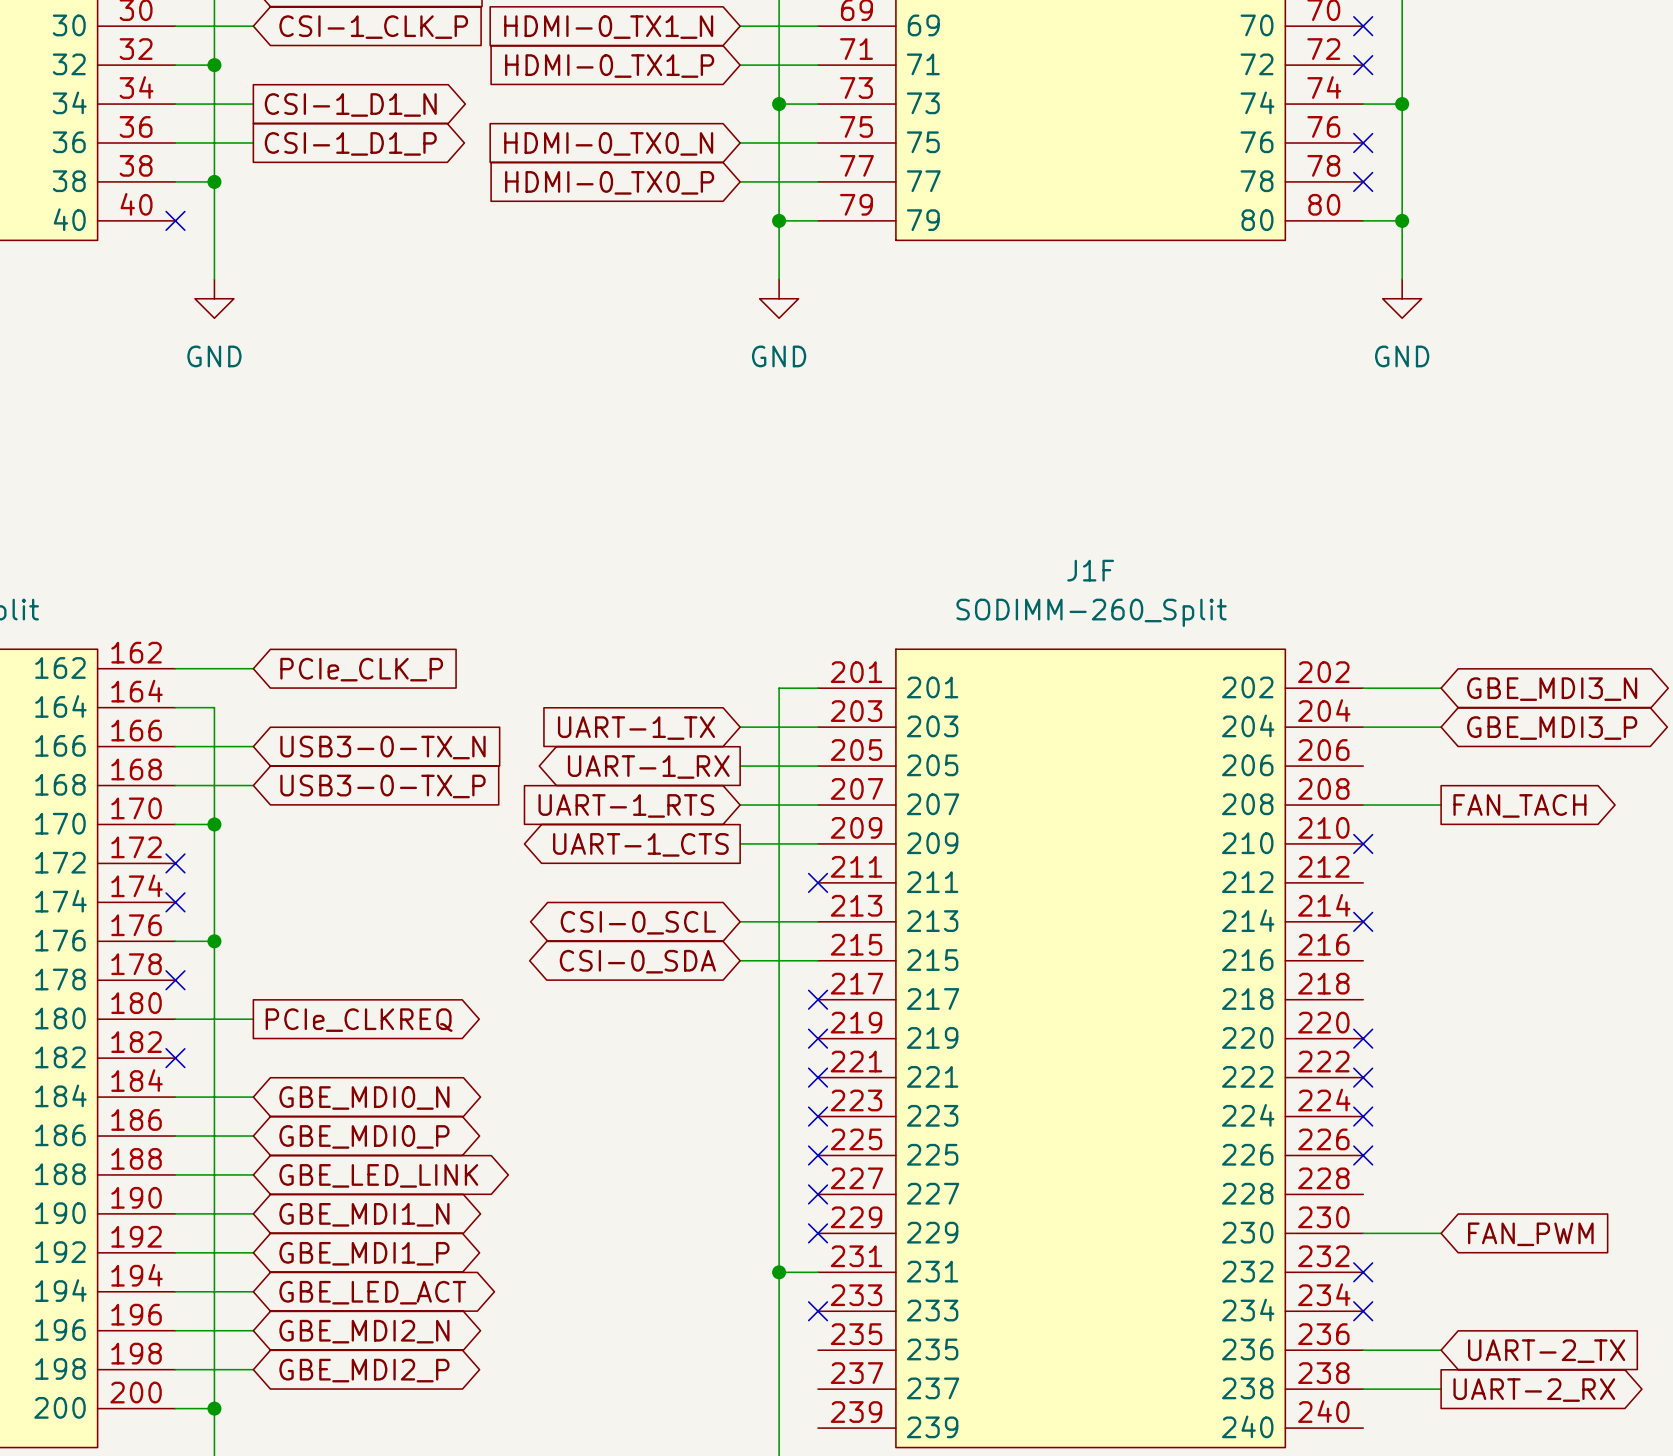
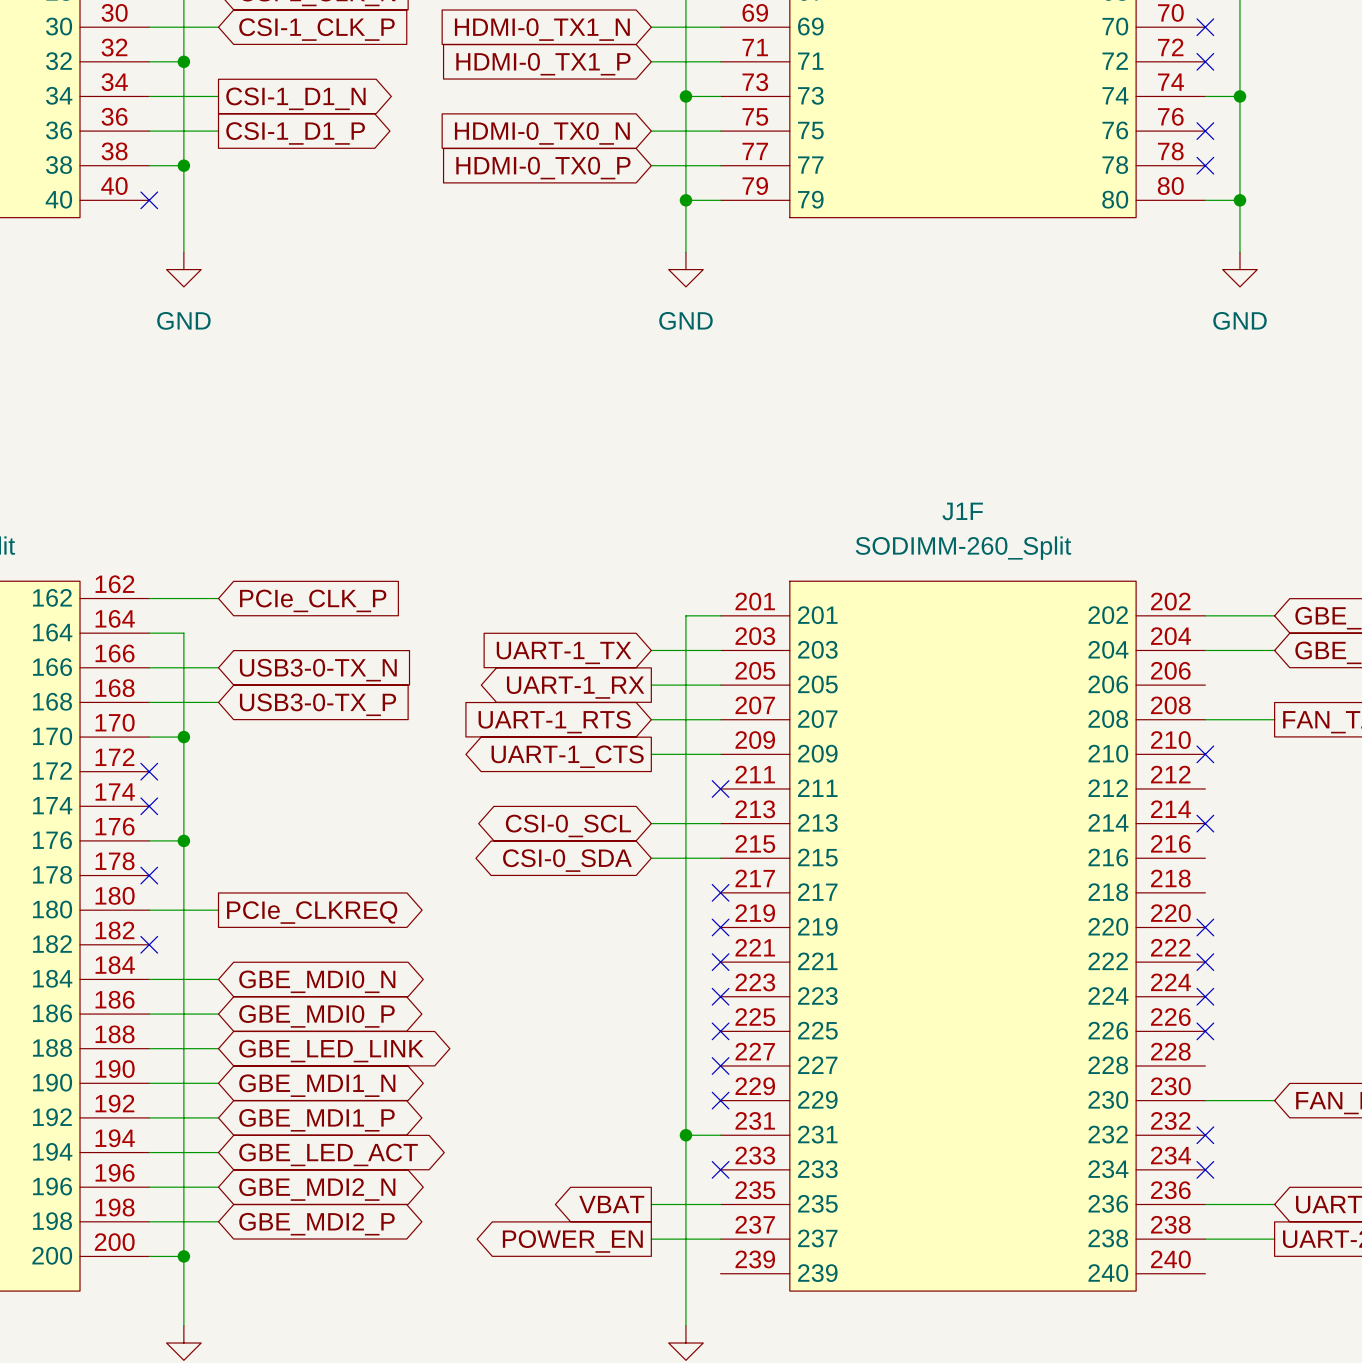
global label: none -> VBAT (611, 1204)
wire: none -> (651, 1204) (720, 1204)
wire: none -> (651, 1239) (720, 1239)
global label: none -> POWER_EN (572, 1241)

